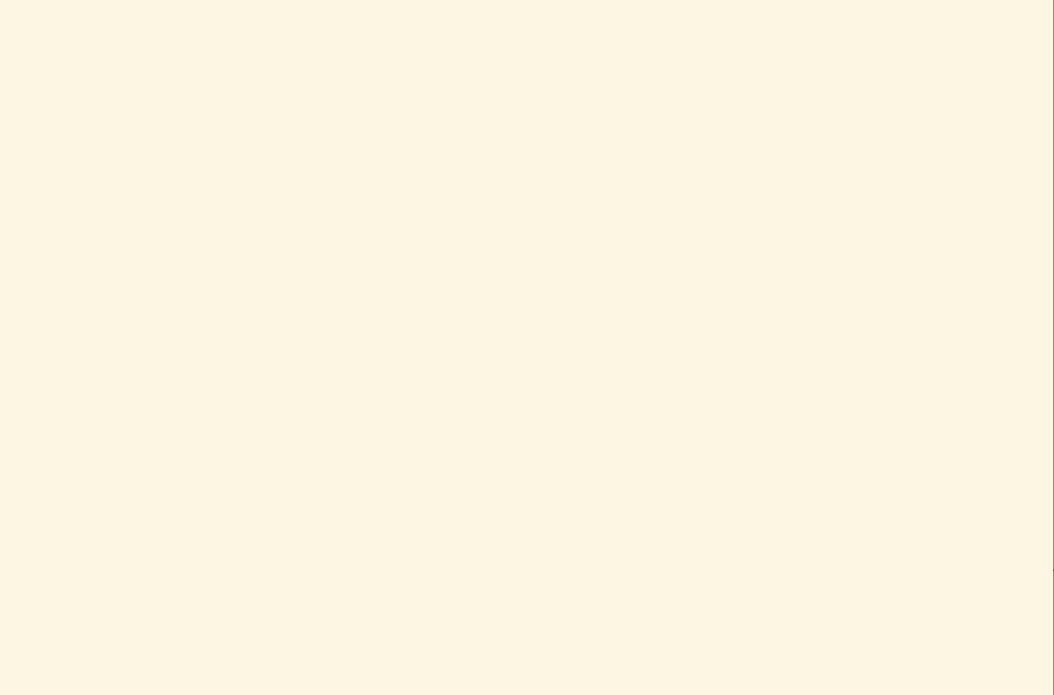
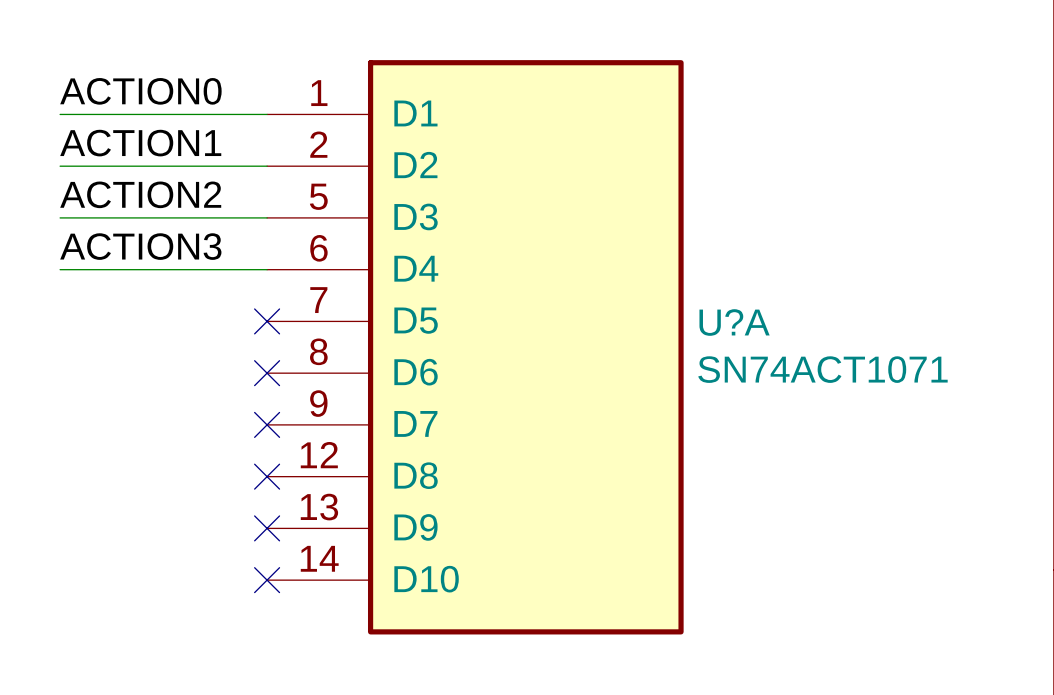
label: none -> ACTION0 (140, 91)
wire: none -> (60, 114) (267, 114)
label: none -> ACTION1 (140, 143)
wire: none -> (60, 166) (267, 166)
label: none -> ACTION2 (140, 194)
wire: none -> (60, 217) (267, 217)
label: none -> ACTION3 (140, 246)
wire: none -> (60, 269) (267, 269)
no-connect mark: none -> (267, 321)
U?A: none -> SN74ACT1071 (475, 347)
no-connect mark: none -> (267, 373)
no-connect mark: none -> (267, 424)
no-connect mark: none -> (267, 476)
no-connect mark: none -> (267, 528)
no-connect mark: none -> (267, 580)

